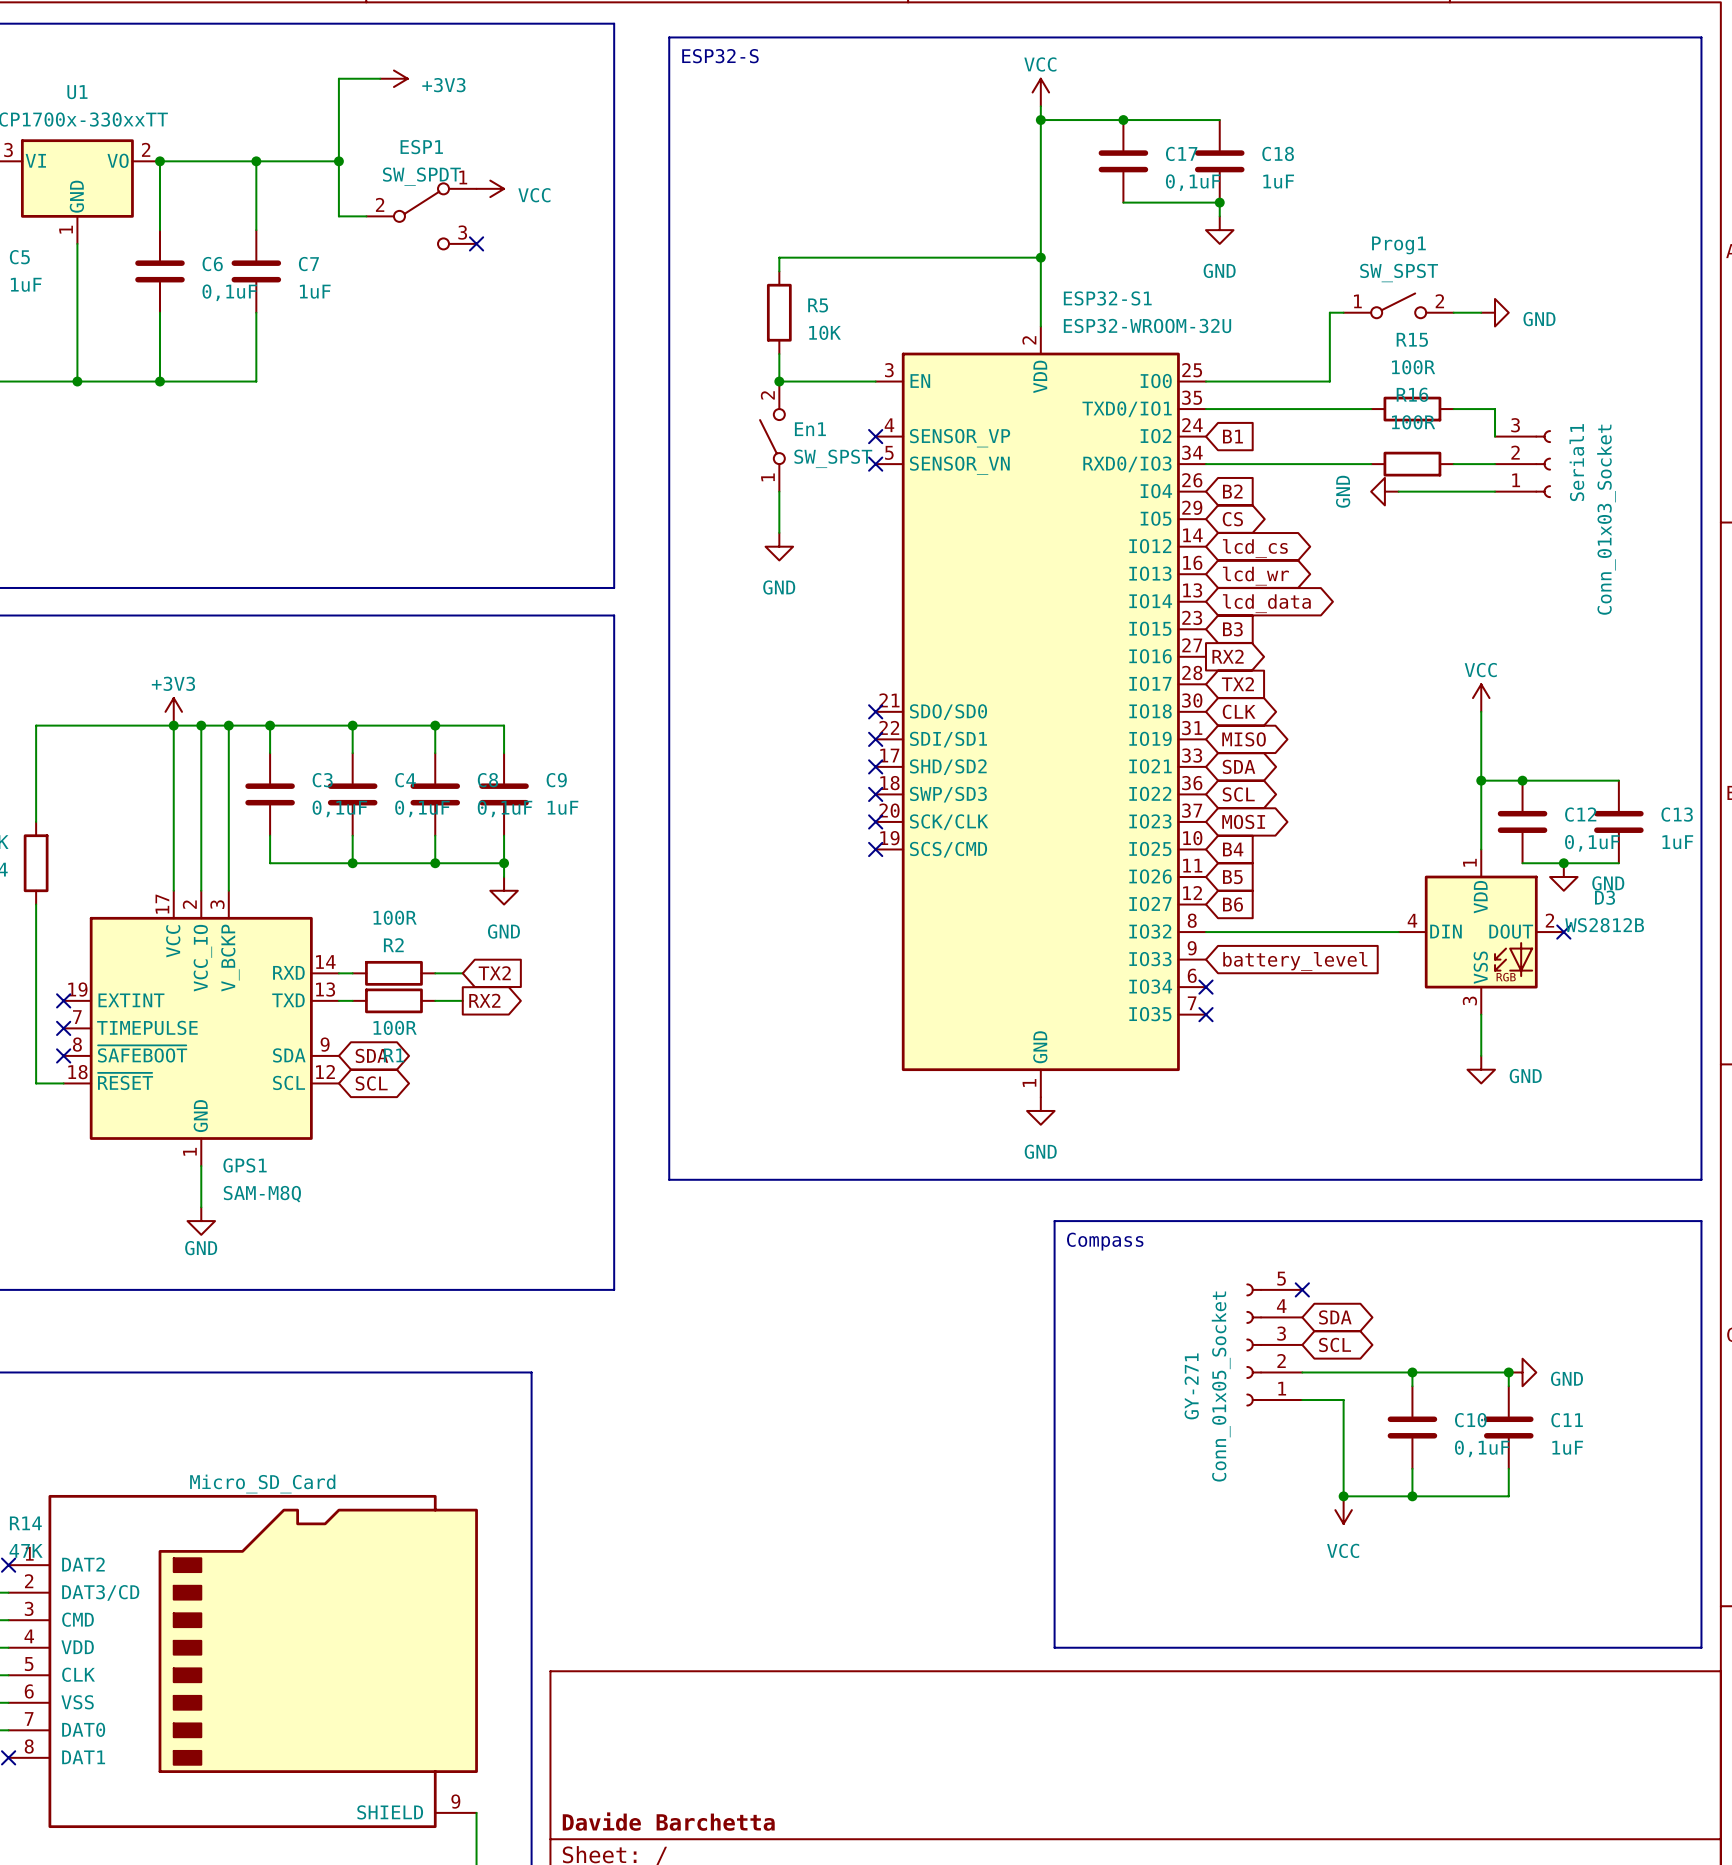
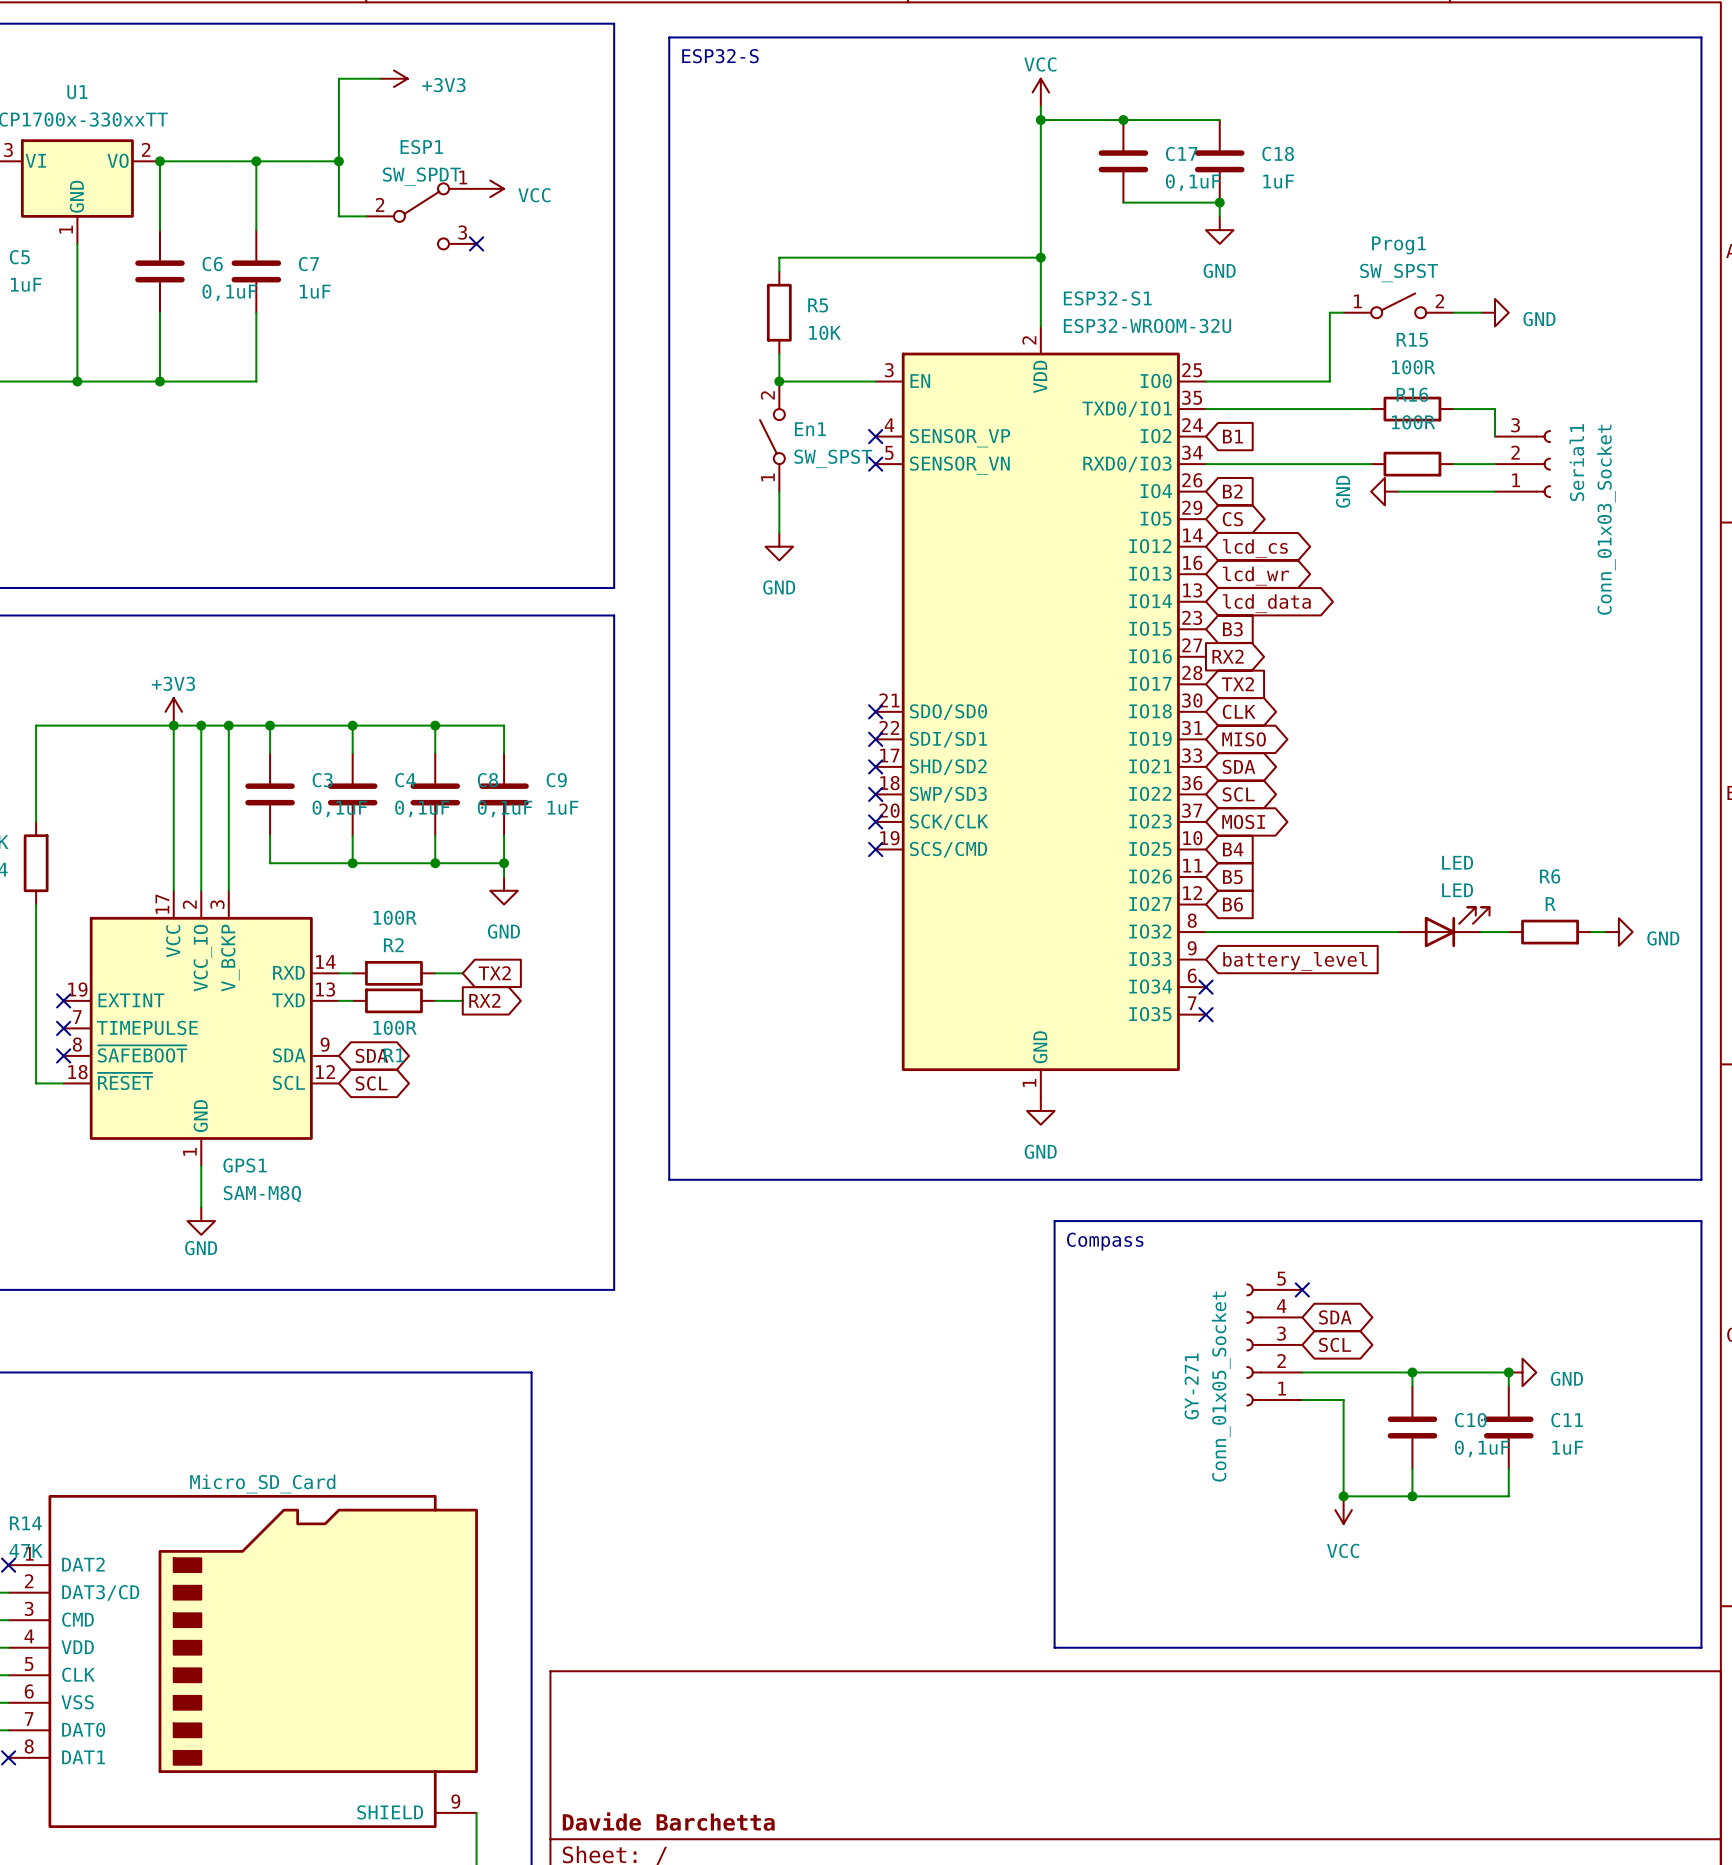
power symbol: VCC (1481, 698) -> none
wire: (1481, 711) (1481, 849) -> none
wire: (1481, 780) (1618, 780) -> none
junction: (1481, 780) -> none
junction: (1522, 780) -> none
C12: 0,1uF (1522, 821) -> none
C13: 1uF (1618, 821) -> none
wire: (1522, 863) (1618, 863) -> none
junction: (1563, 863) -> none
power symbol rotation: 0° (1563, 877) -> 90° counterclockwise (1618, 932)
power symbol position: GND (1563, 877) -> GND (1618, 932)
LED: none -> LED (1444, 927)
D3: WS2812B (1481, 932) -> none
R6: none -> R (1550, 932)
no-connect mark: (1563, 932) -> none
wire: none -> (1591, 932) (1605, 932)
wire: (1481, 1014) (1481, 1055) -> none
power symbol: GND (1481, 1069) -> none

